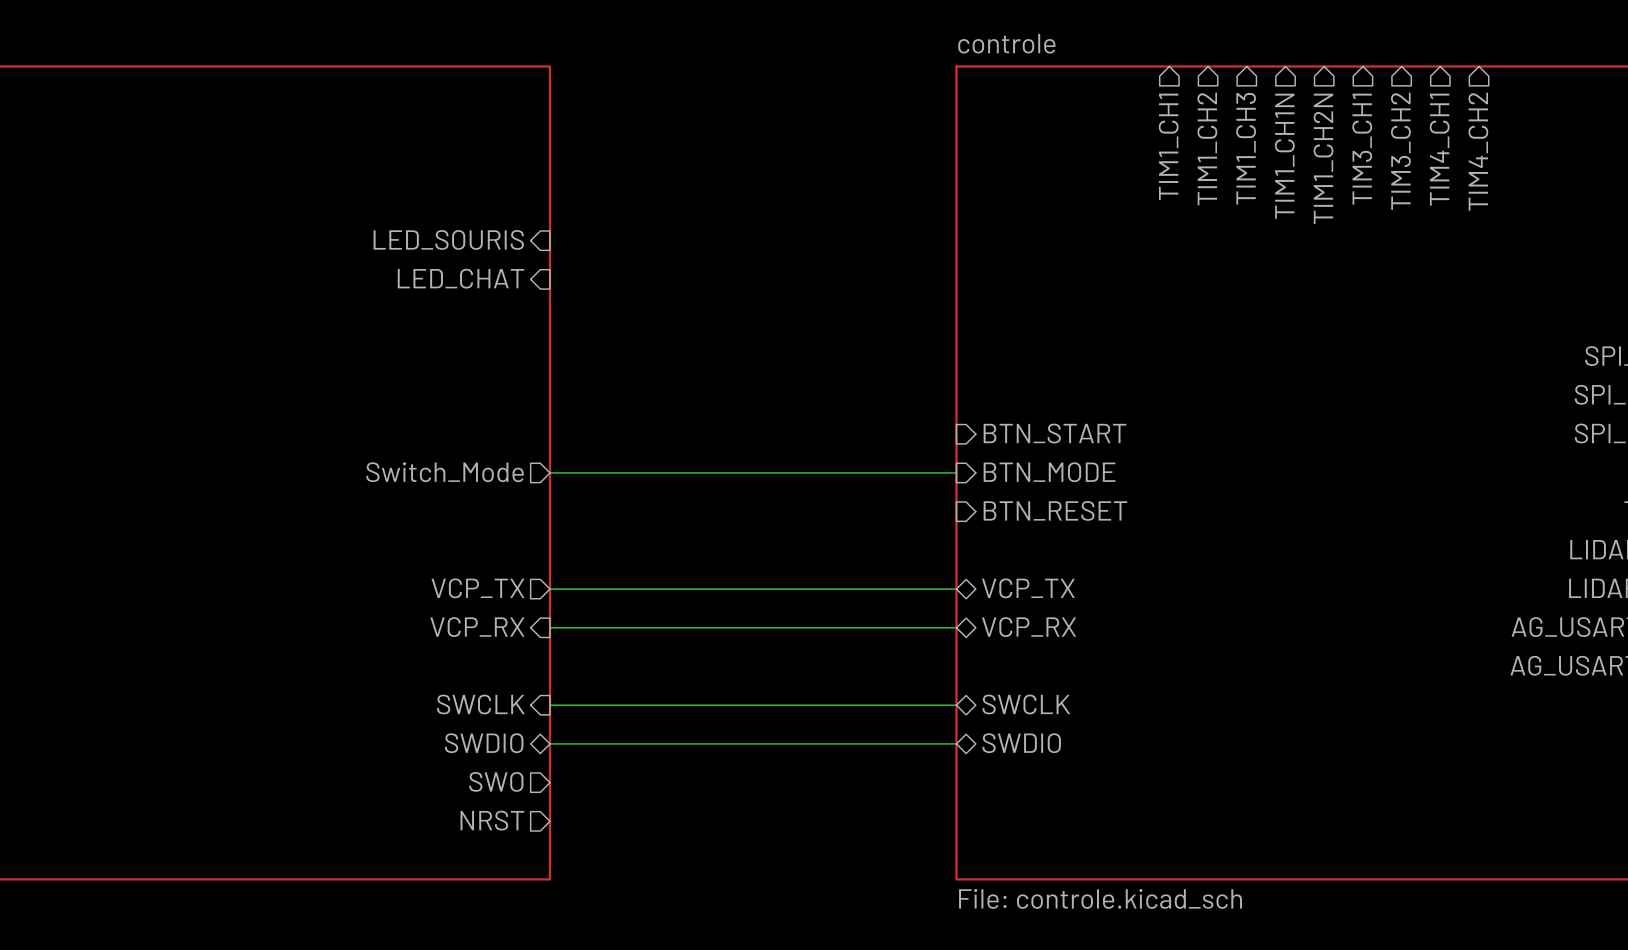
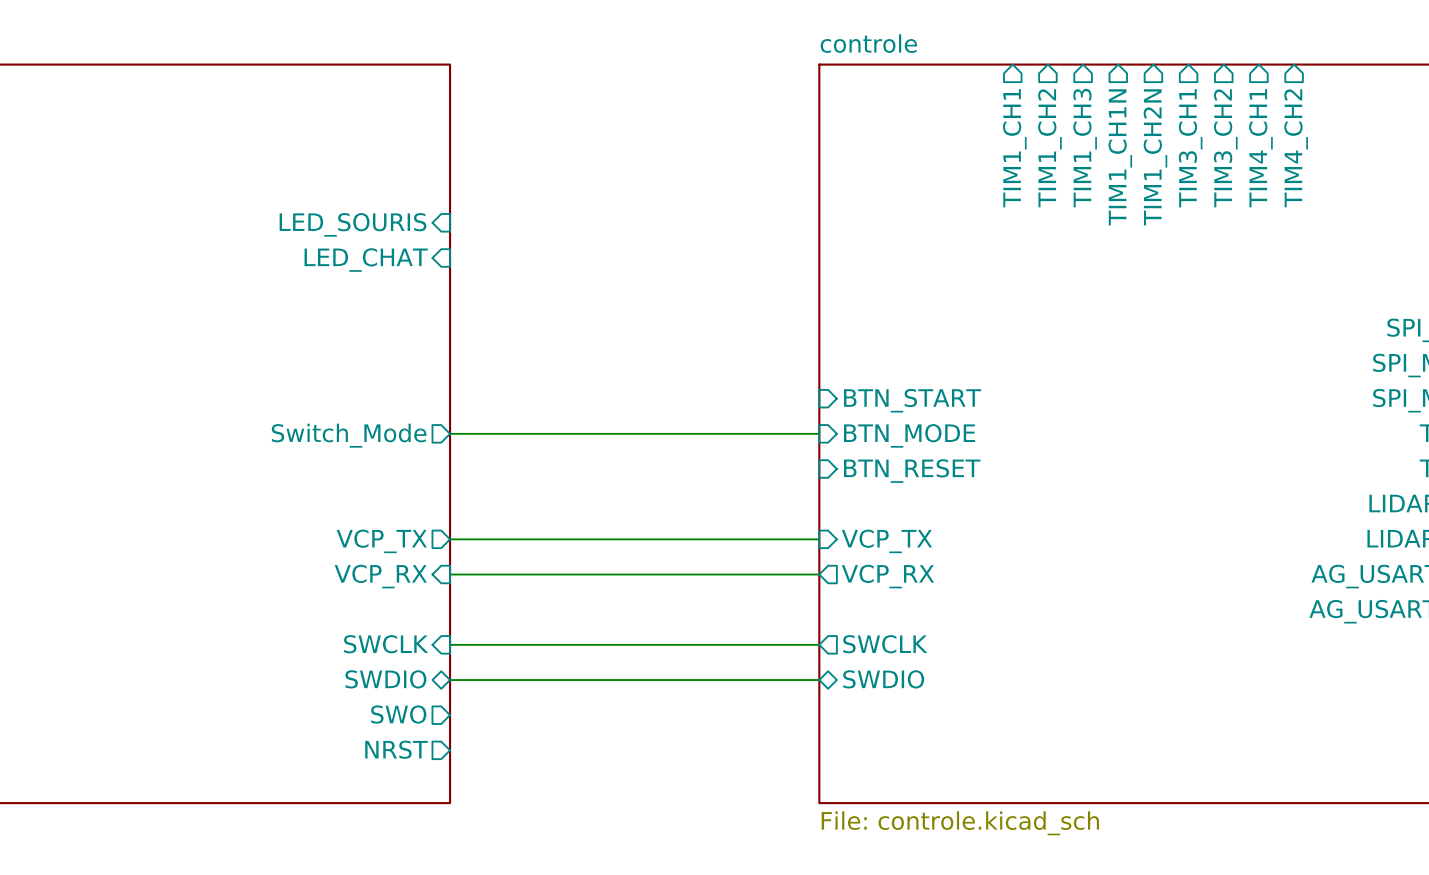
sheet pin shape: bidirectional (1028, 588) -> input (886, 541)
sheet pin shape: bidirectional (1029, 627) -> output (887, 576)
sheet pin shape: bidirectional (1026, 704) -> output (885, 644)

